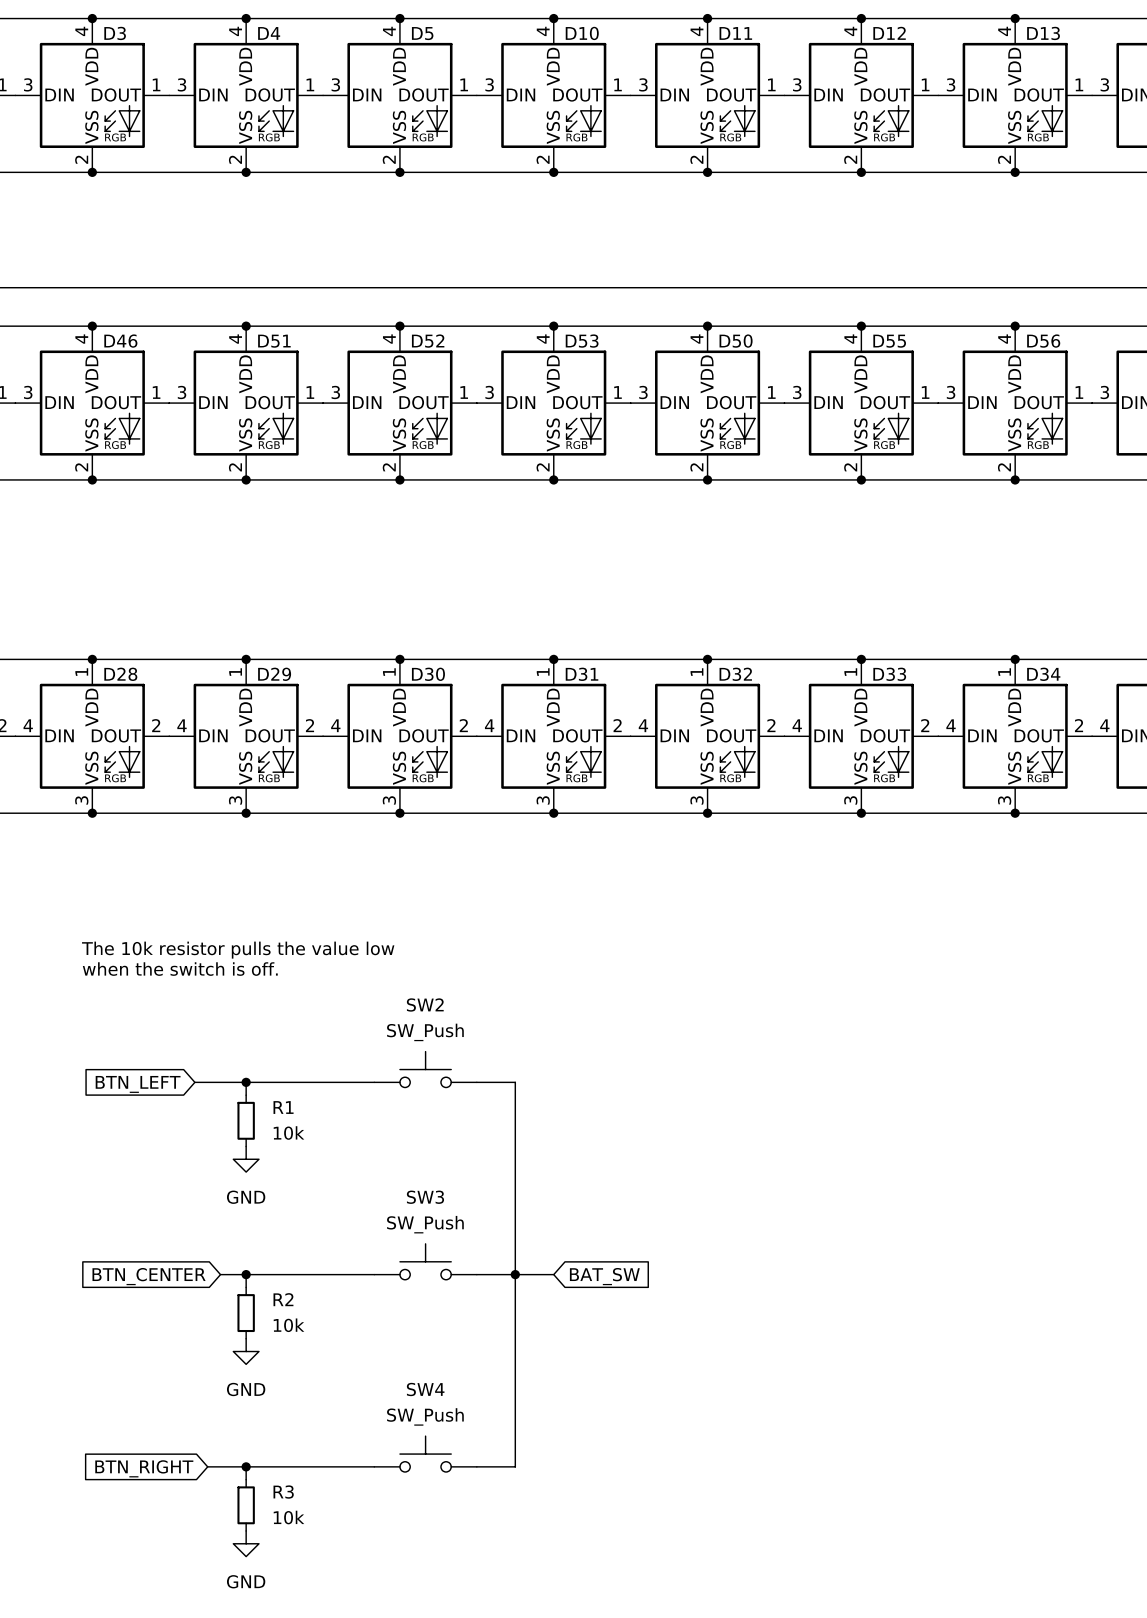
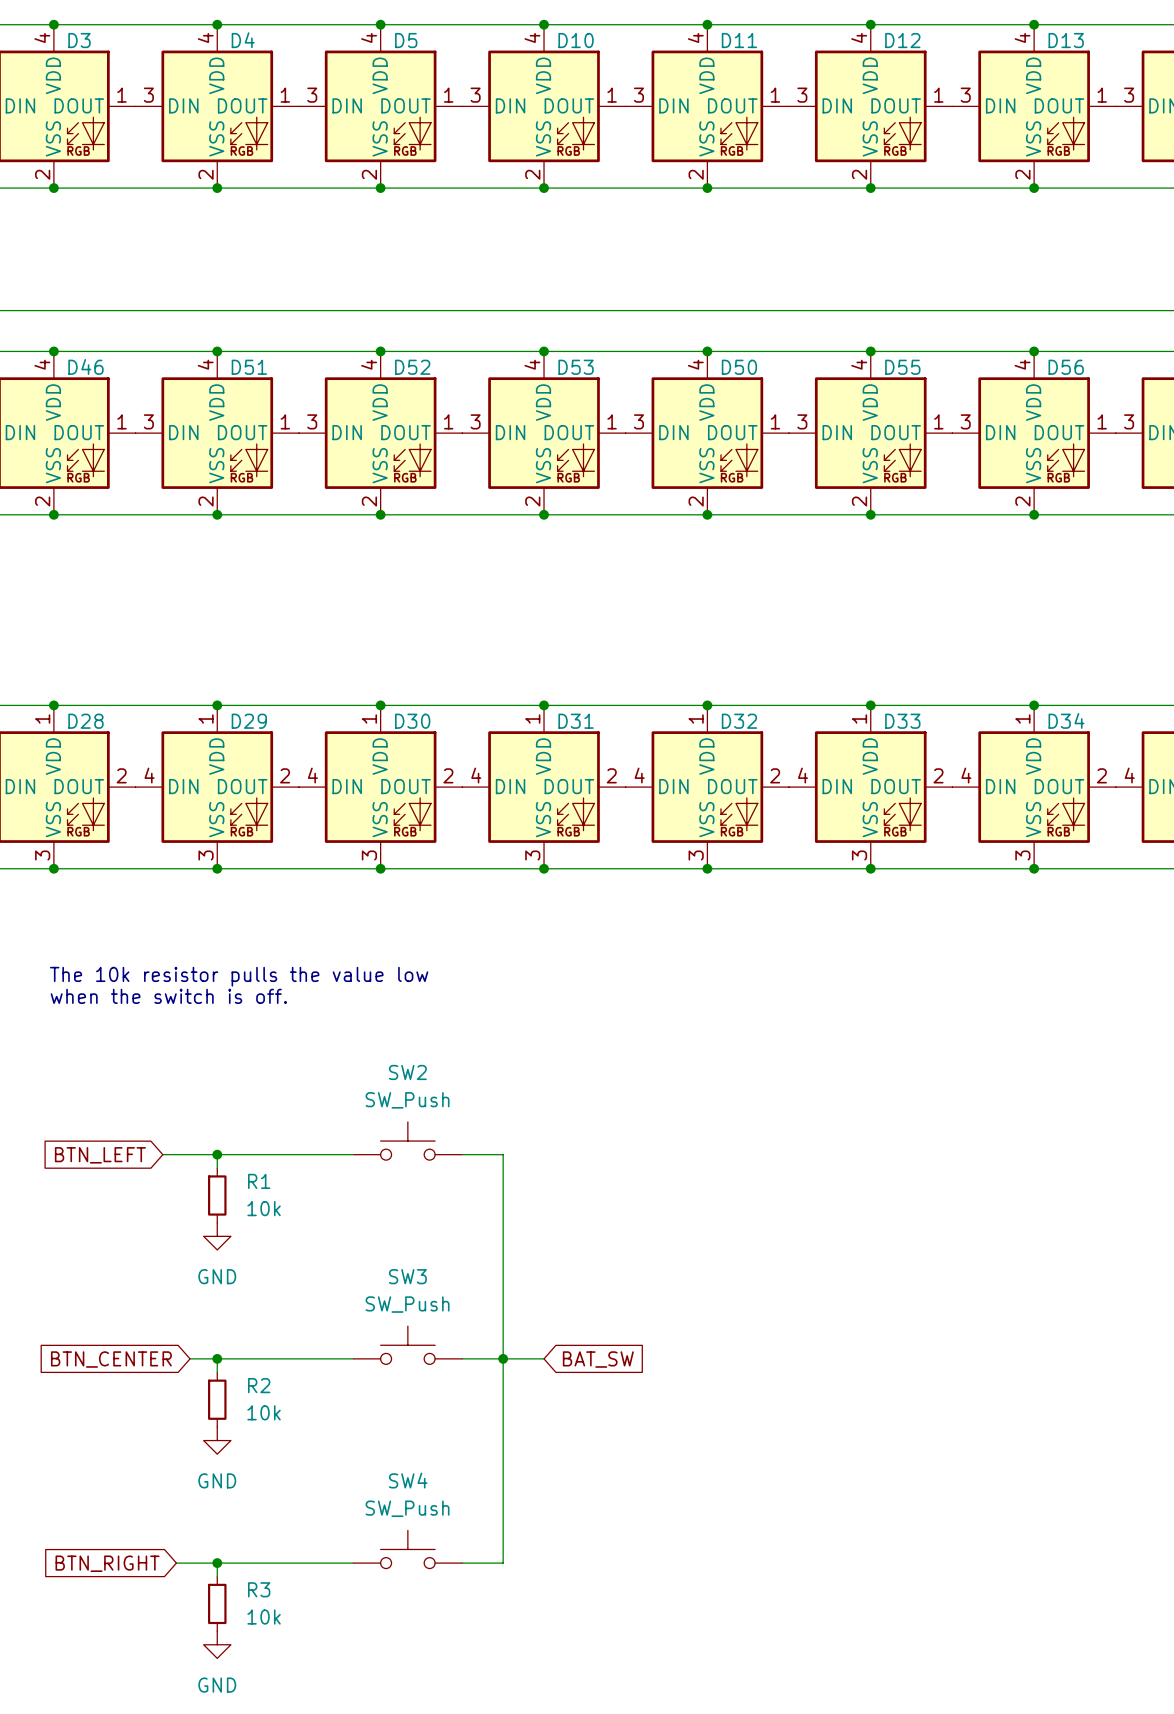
text position: The 10k resistor pulls the value low (238, 950) -> The 10k resistor pulls the value low (239, 976)
text position: when the switch is off. (180, 969) -> when the switch is off. (168, 996)

